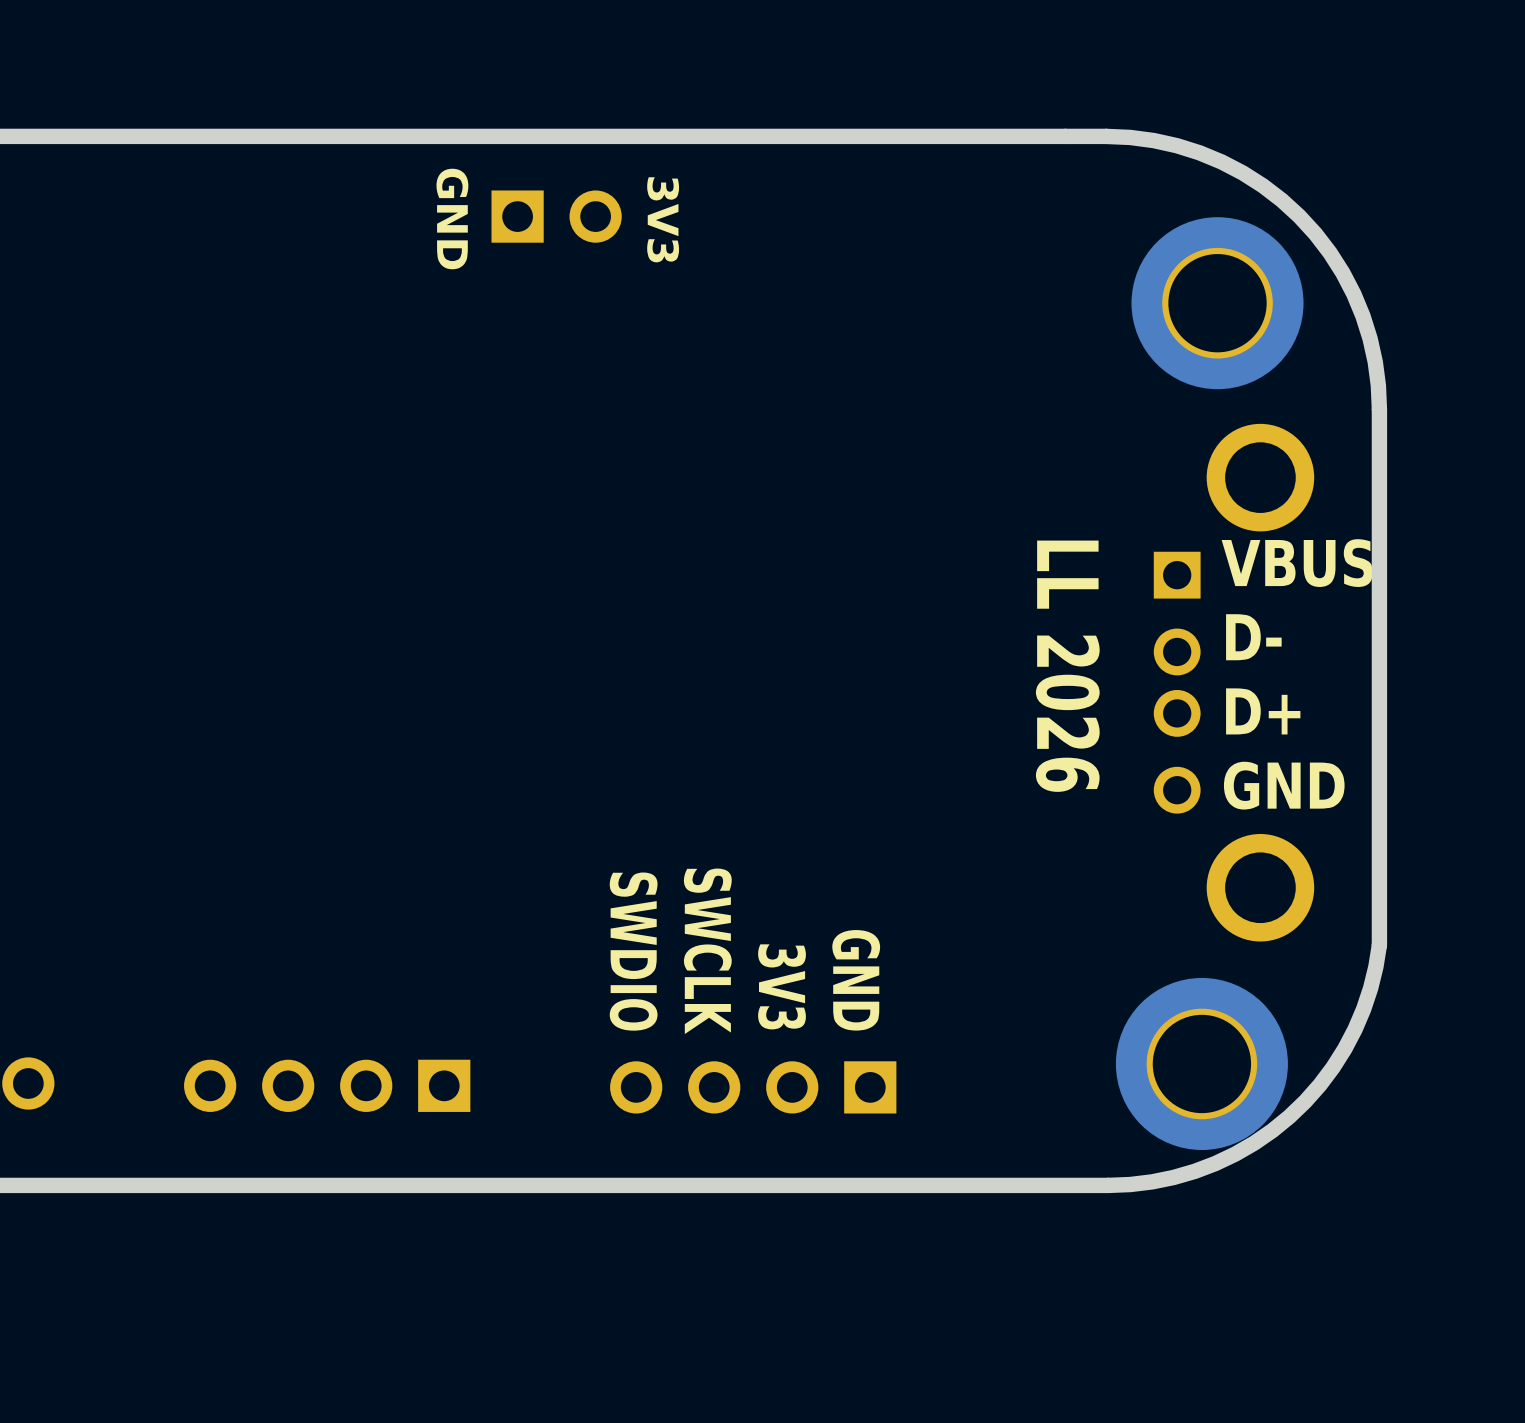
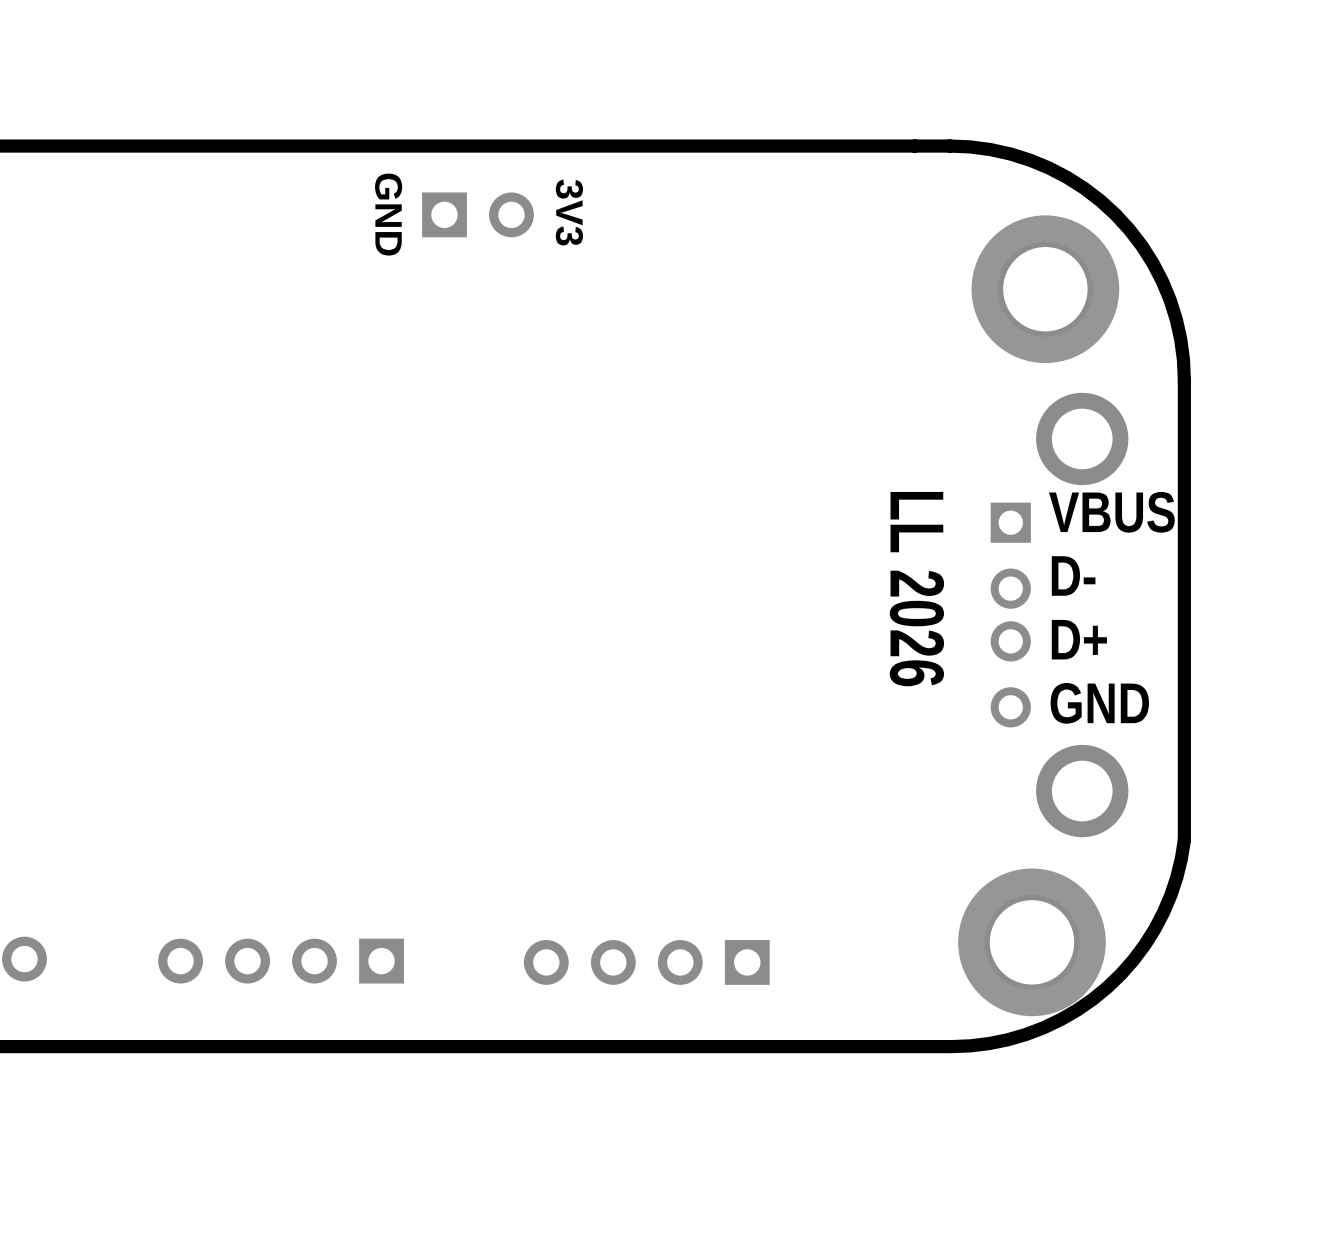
text: SWDIO (633, 951) -> none
text: SWCLK (707, 951) -> none
text: GND (856, 980) -> none
text: 3V3 (782, 986) -> none

